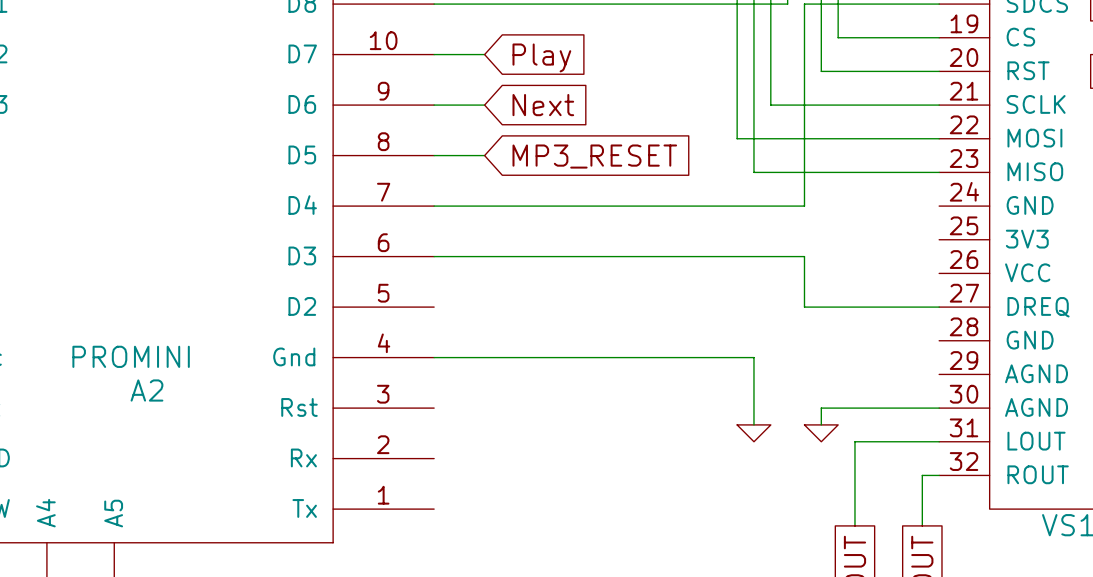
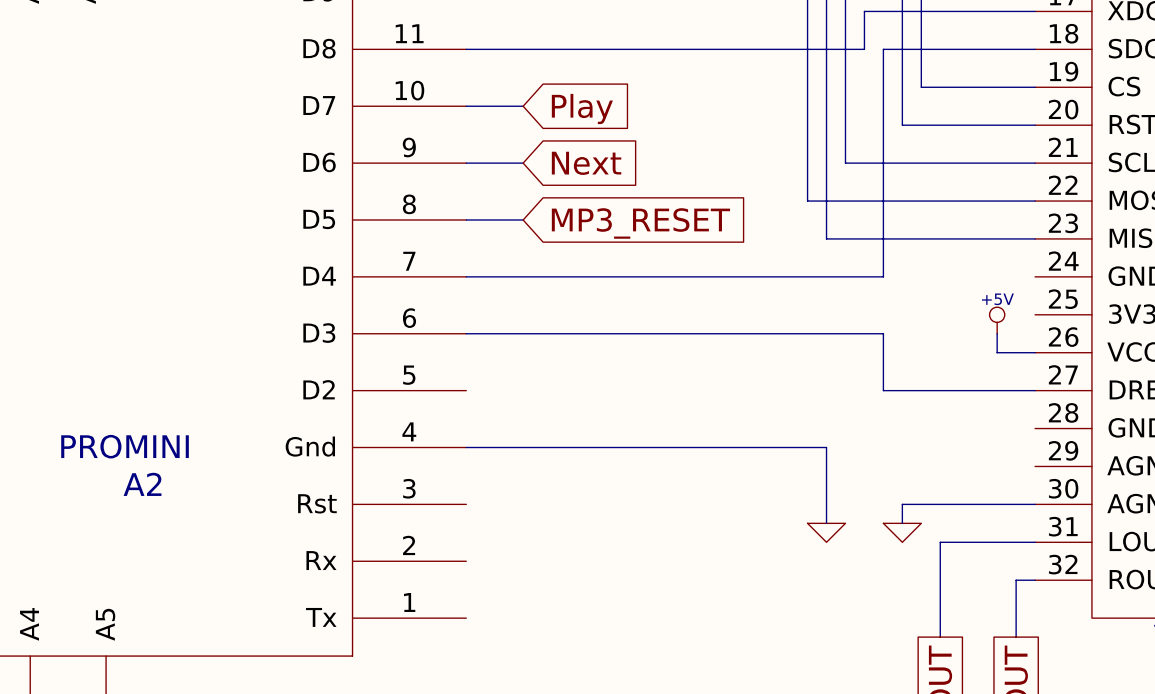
power symbol: none -> +5V (997, 320)
wire: none -> (997, 333) (997, 352) (1035, 352)

